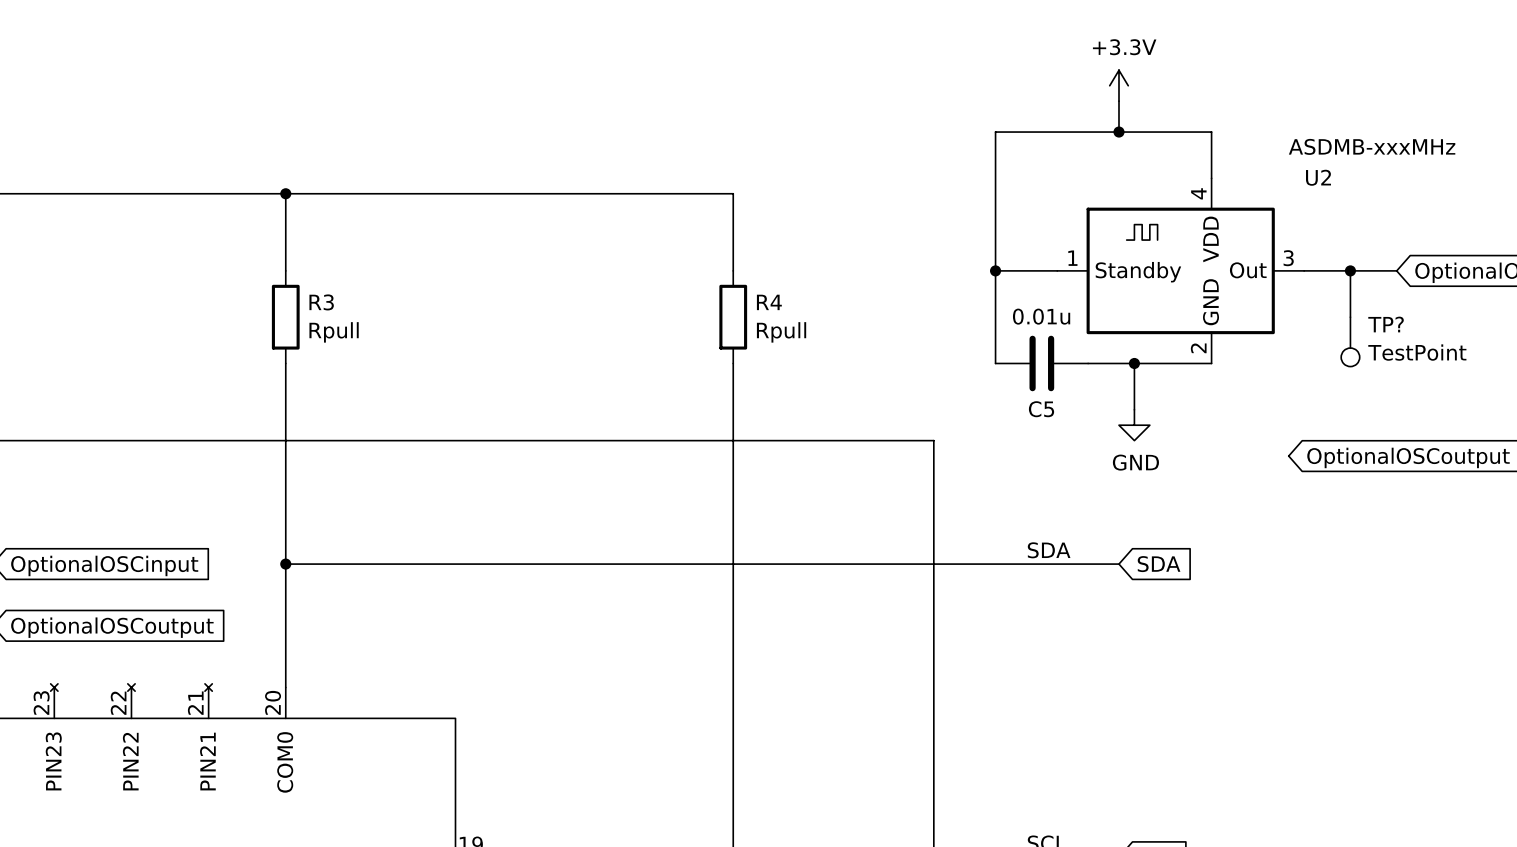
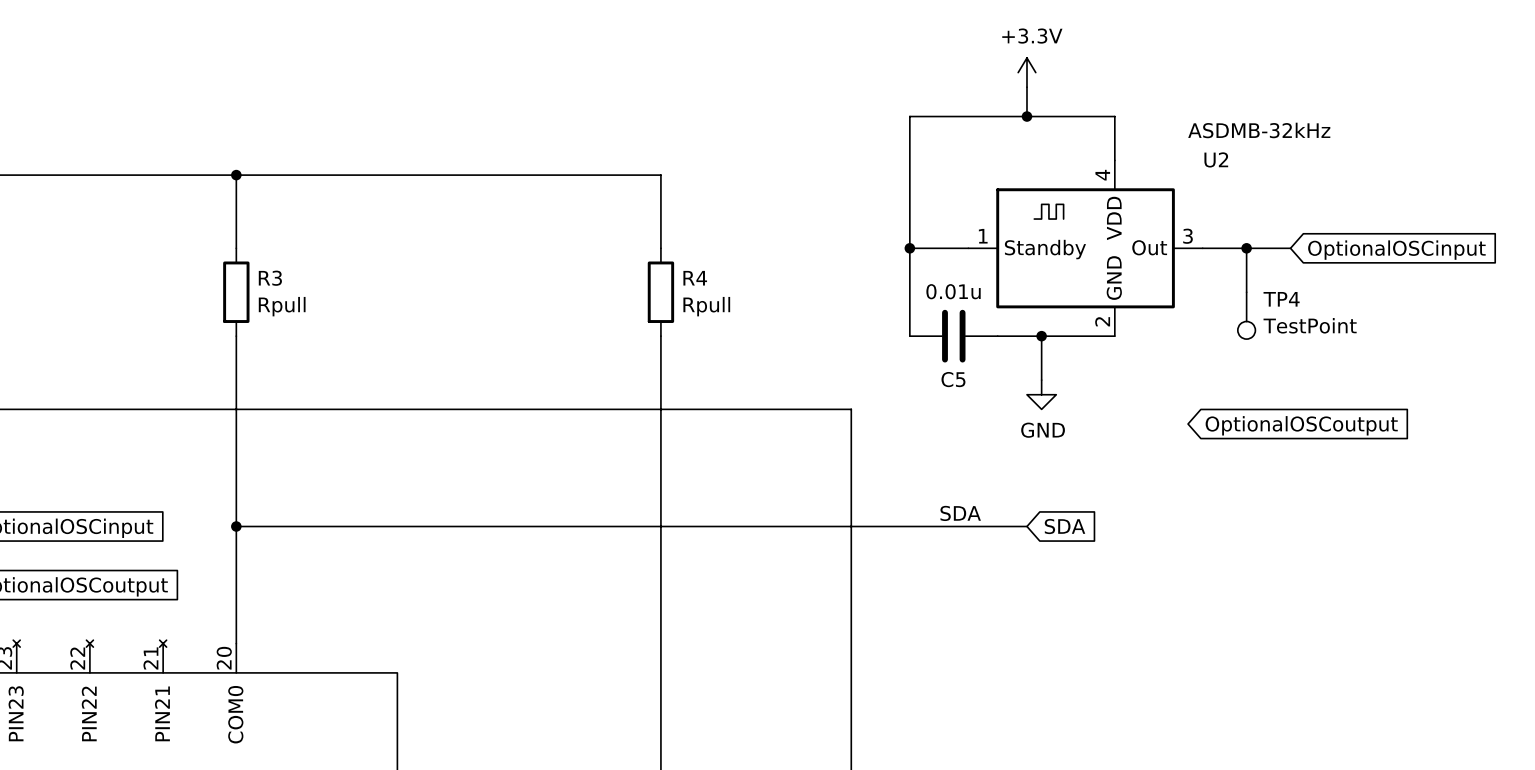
U2 value: ASDMB-xxxMHz (1372, 146) -> ASDMB-32kHz (1259, 130)
TP? name: TP? (1386, 324) -> TP4 (1281, 299)

